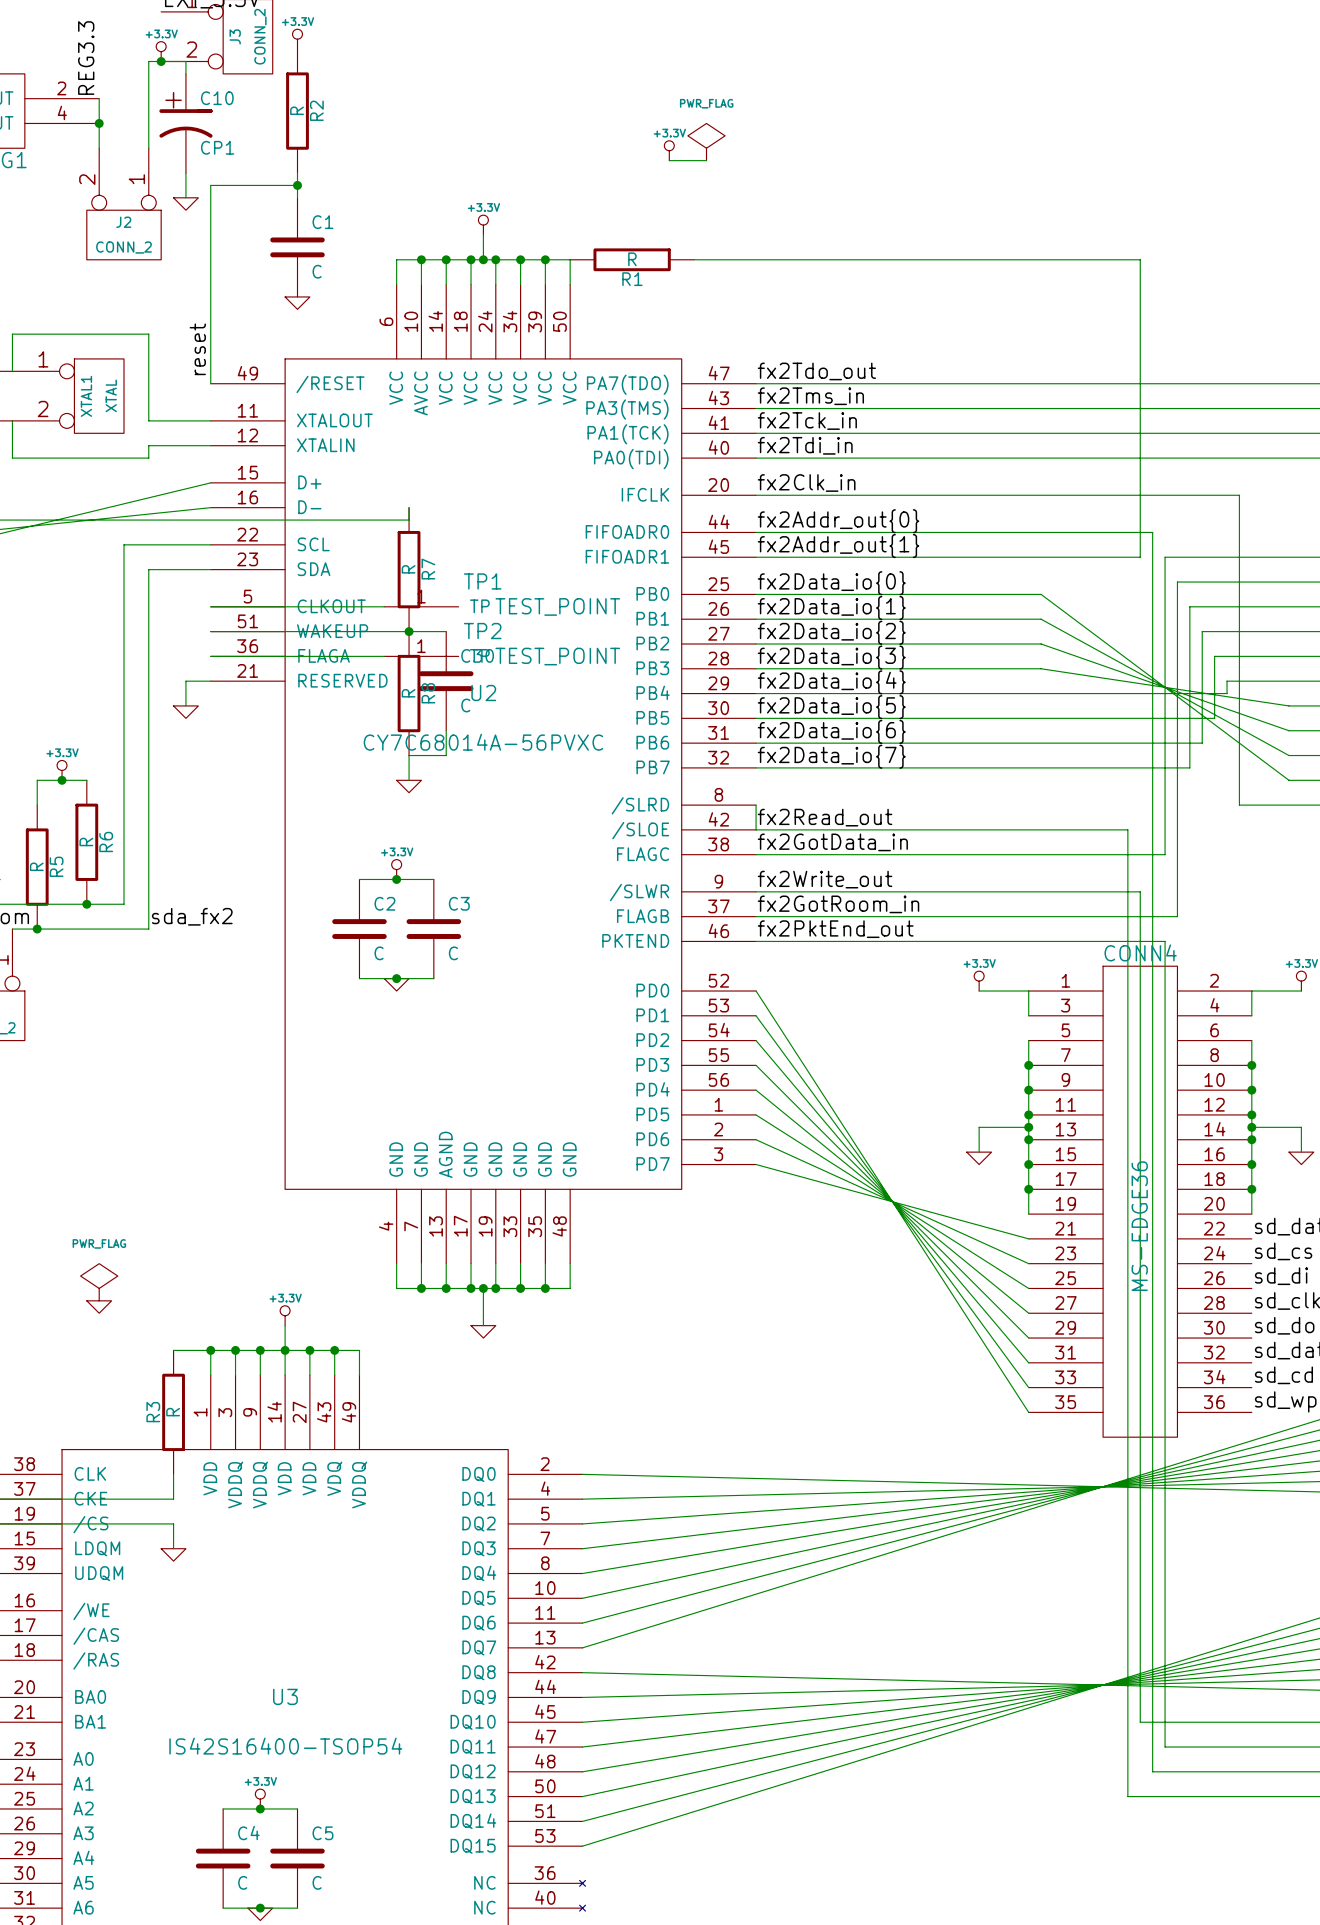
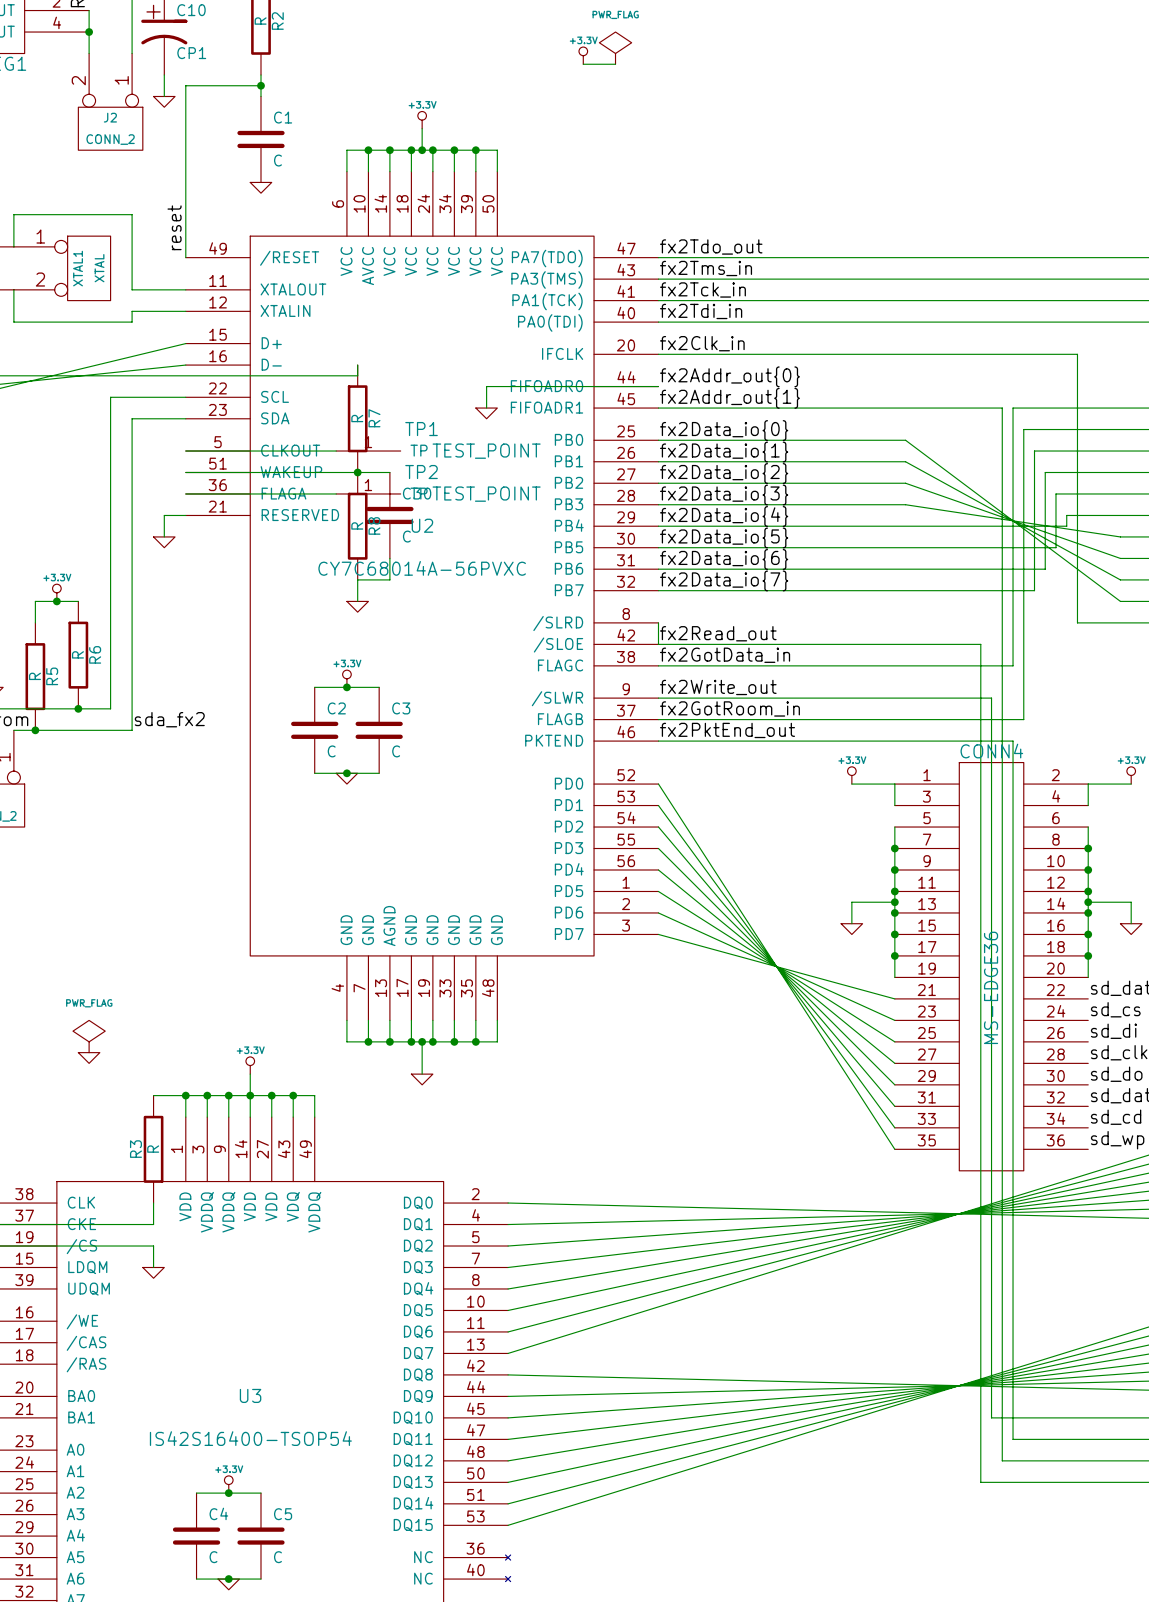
R1: R (632, 259) -> none
wire: (694, 259) (1140, 259) (1140, 557) -> none
wire: (756, 532) (1152, 532) (1152, 557) -> (991, 408) (1002, 408)
wire: none -> (658, 386) (486, 386) (486, 408)
power symbol: none -> (486, 413)

